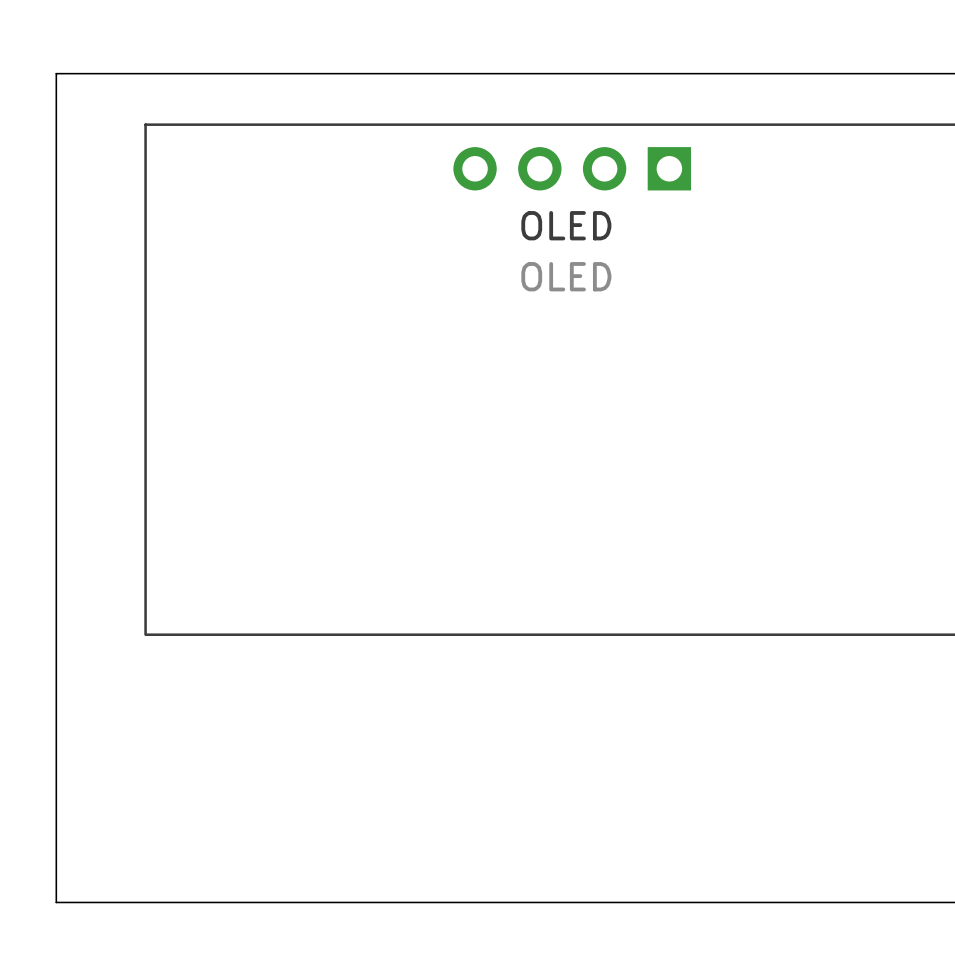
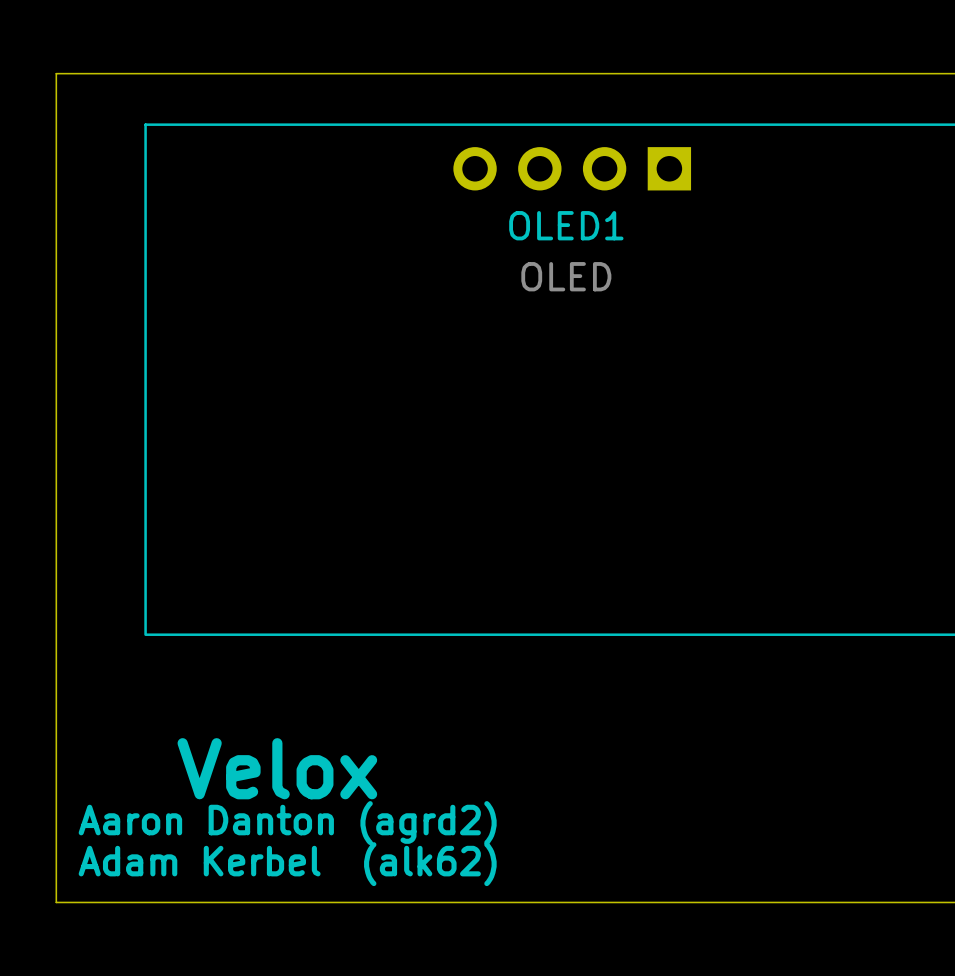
OLED name: OLED (566, 225) -> OLED1 (566, 225)
text: none -> Velox (277, 768)
text: none -> Aaron Danton (agrd2) (287, 823)
text: none -> Adam Kerbel (alk62) (287, 864)

